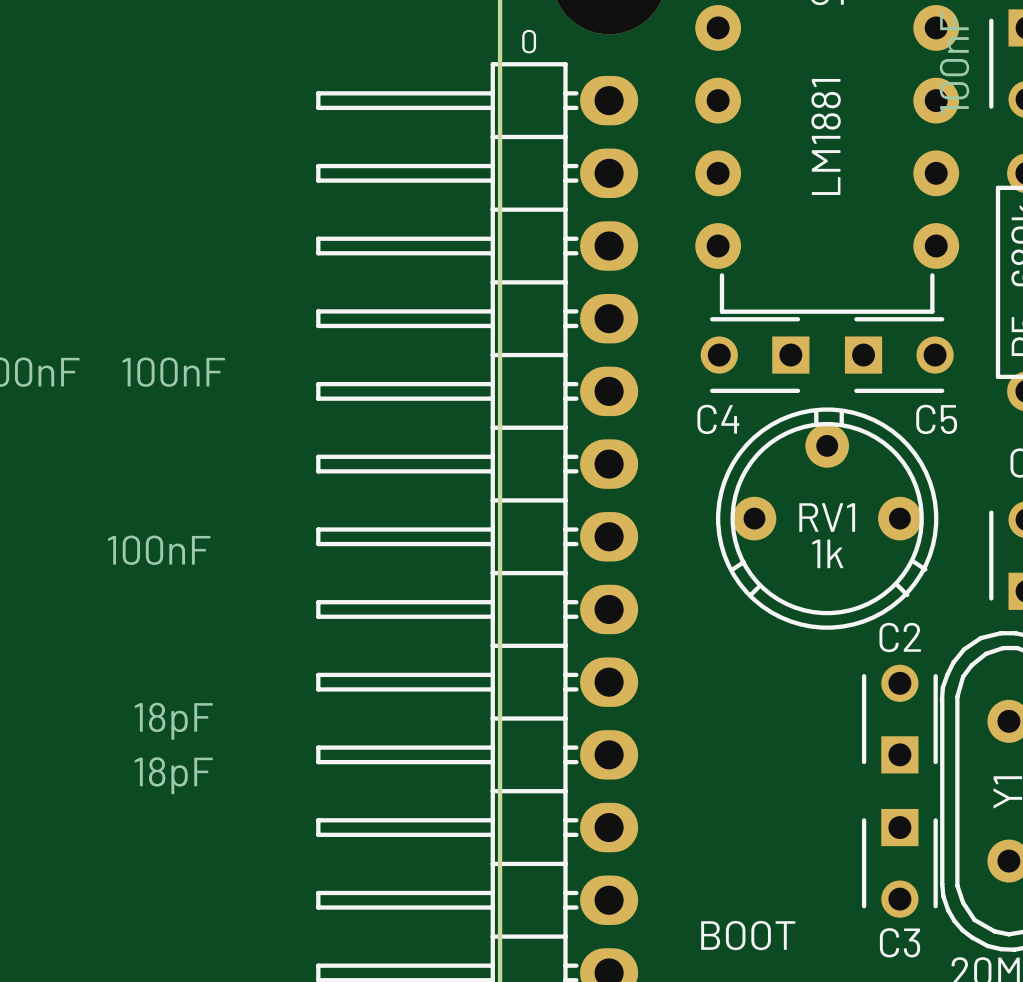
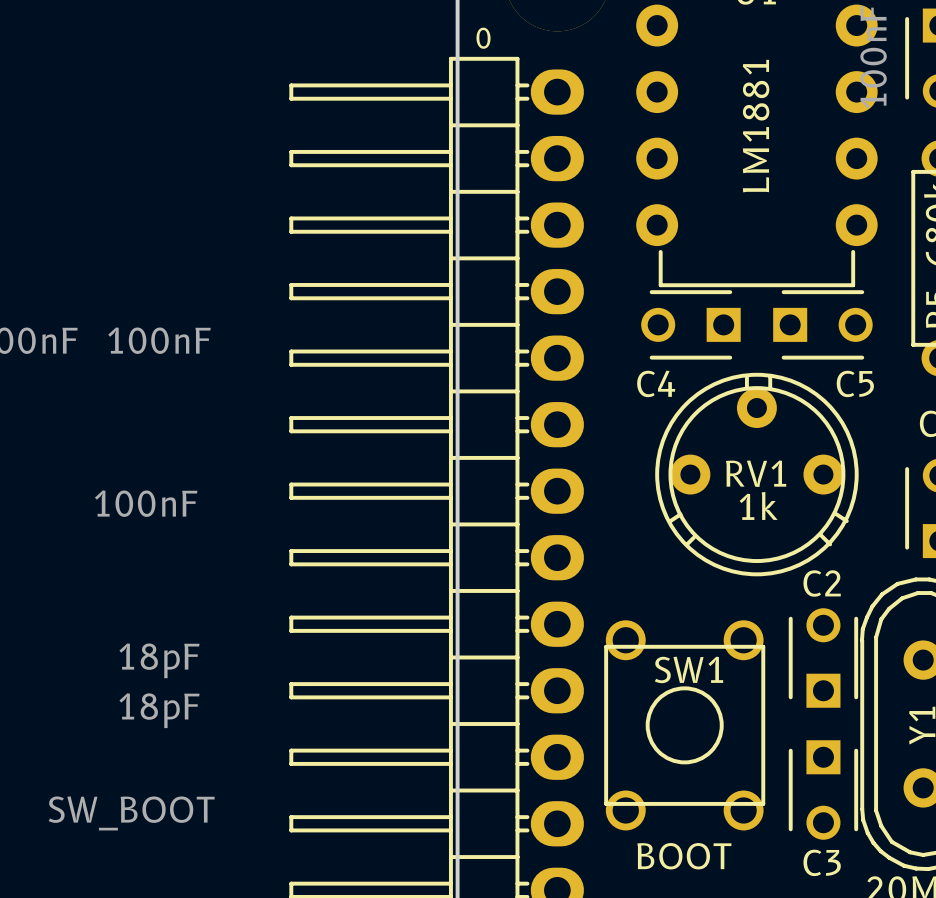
SW1: none -> SW_BOOT (684, 725)

